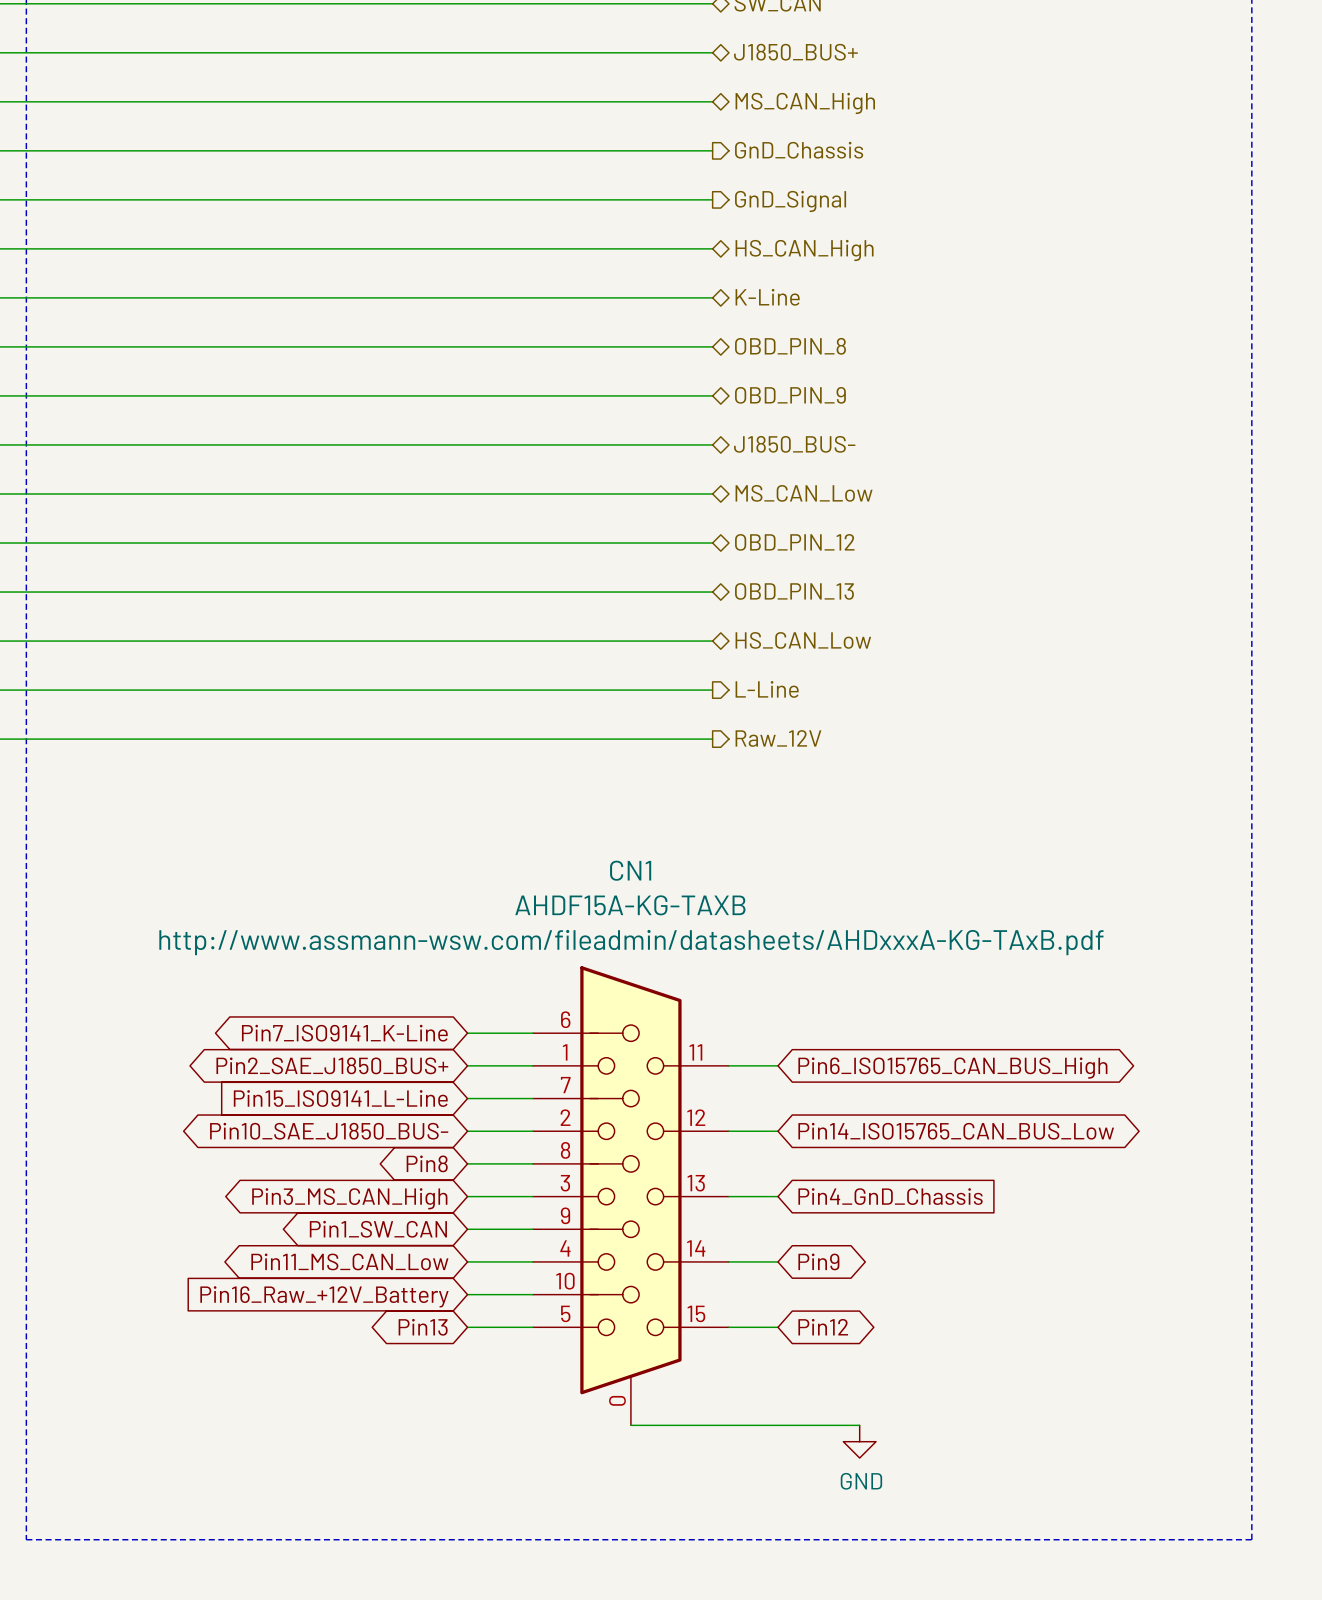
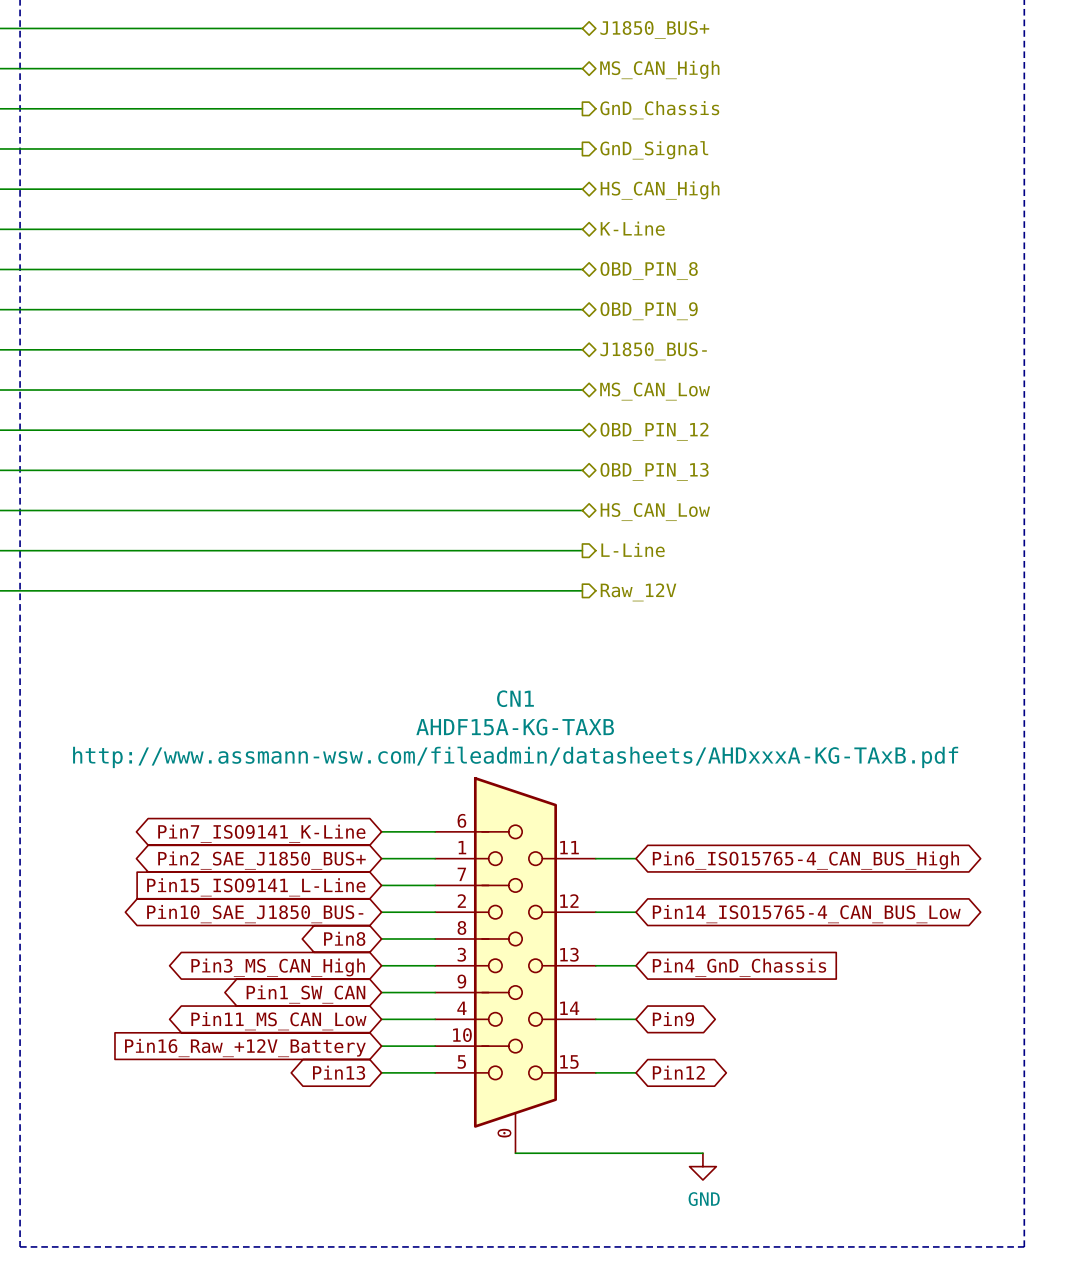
global label: Pin6_ISO15765_CAN_BUS_High (952, 1068) -> Pin6_ISO15765-4_CAN_BUS_High (805, 860)
global label: Pin14_ISO15765_CAN_BUS_Low (956, 1131) -> Pin14_ISO15765-4_CAN_BUS_Low (806, 914)

